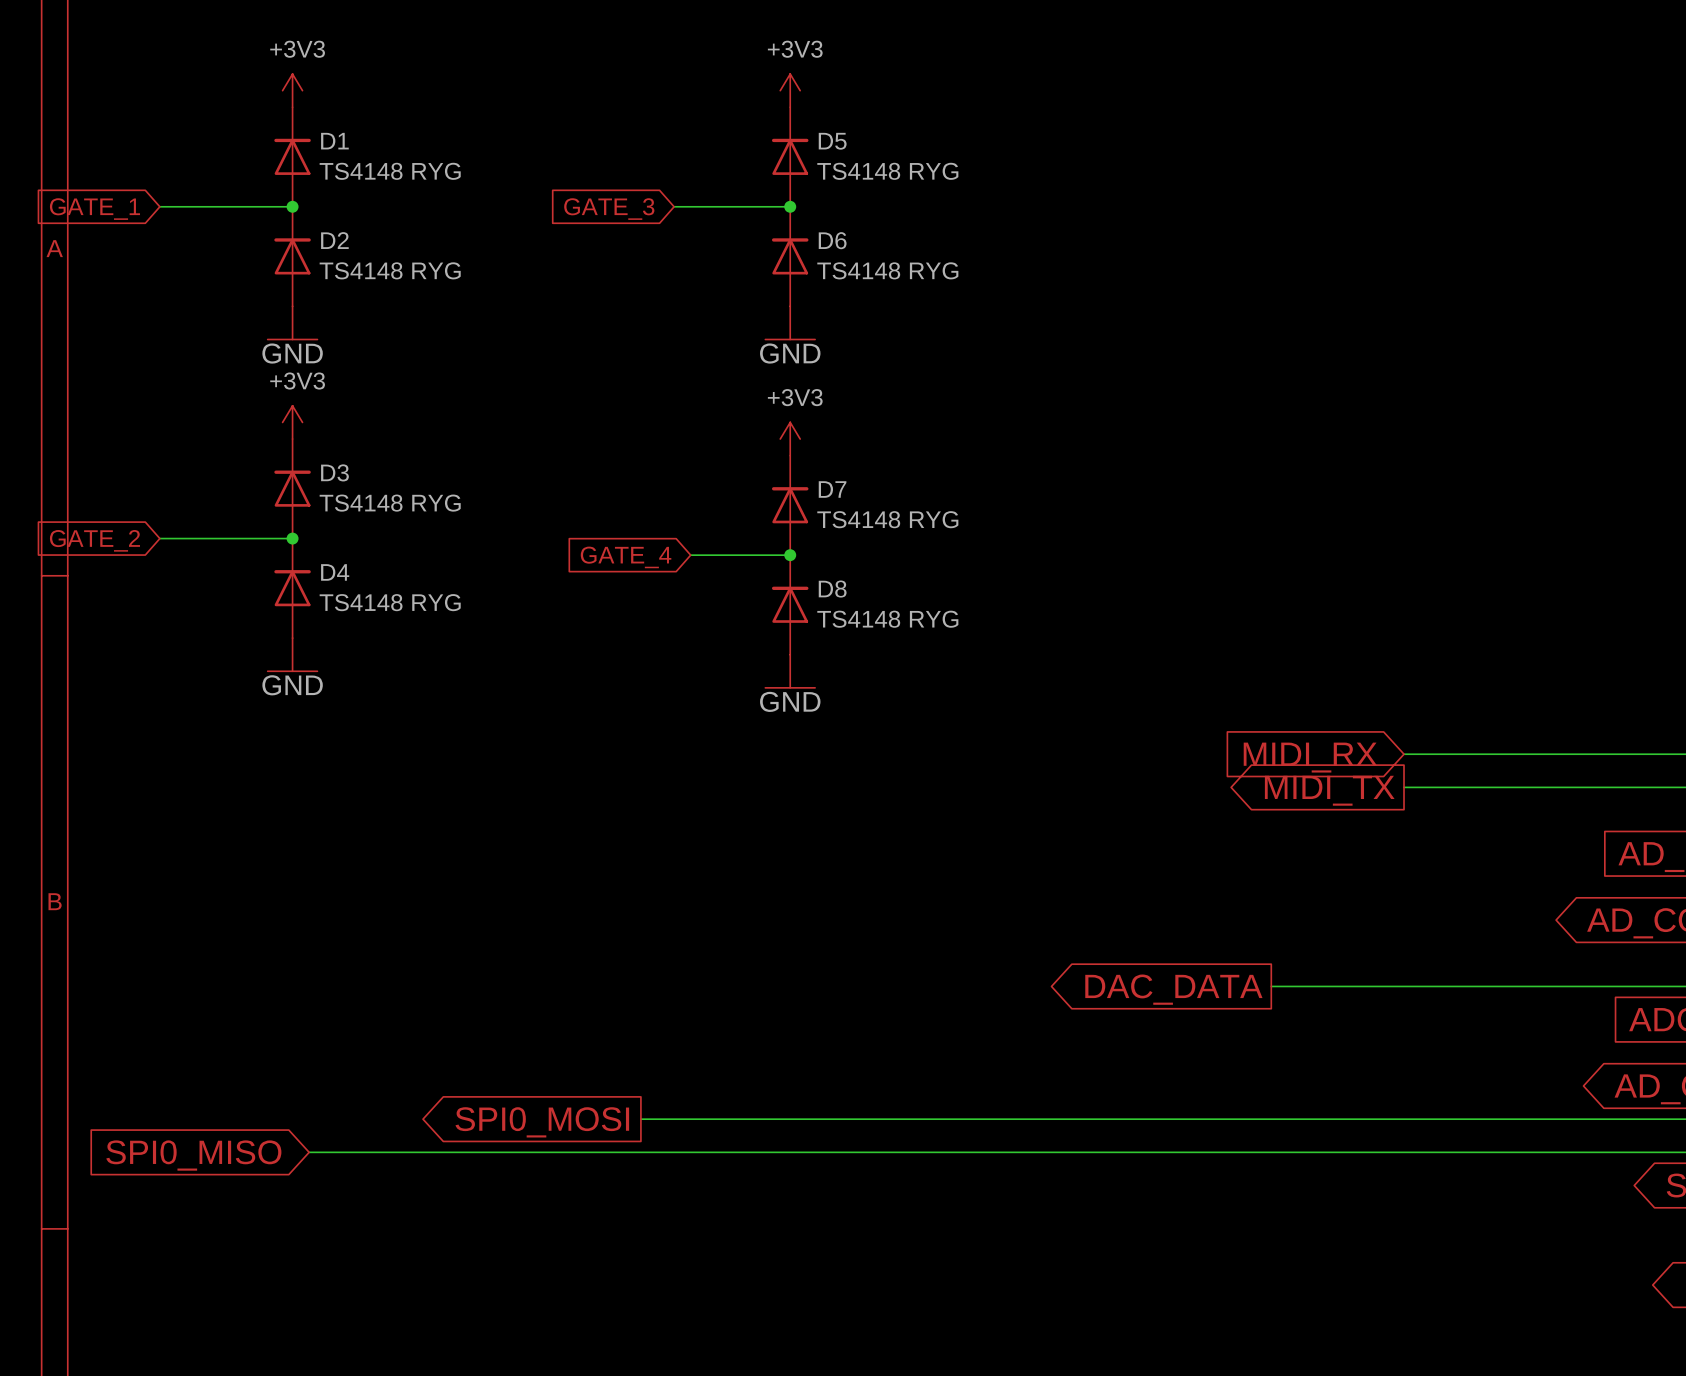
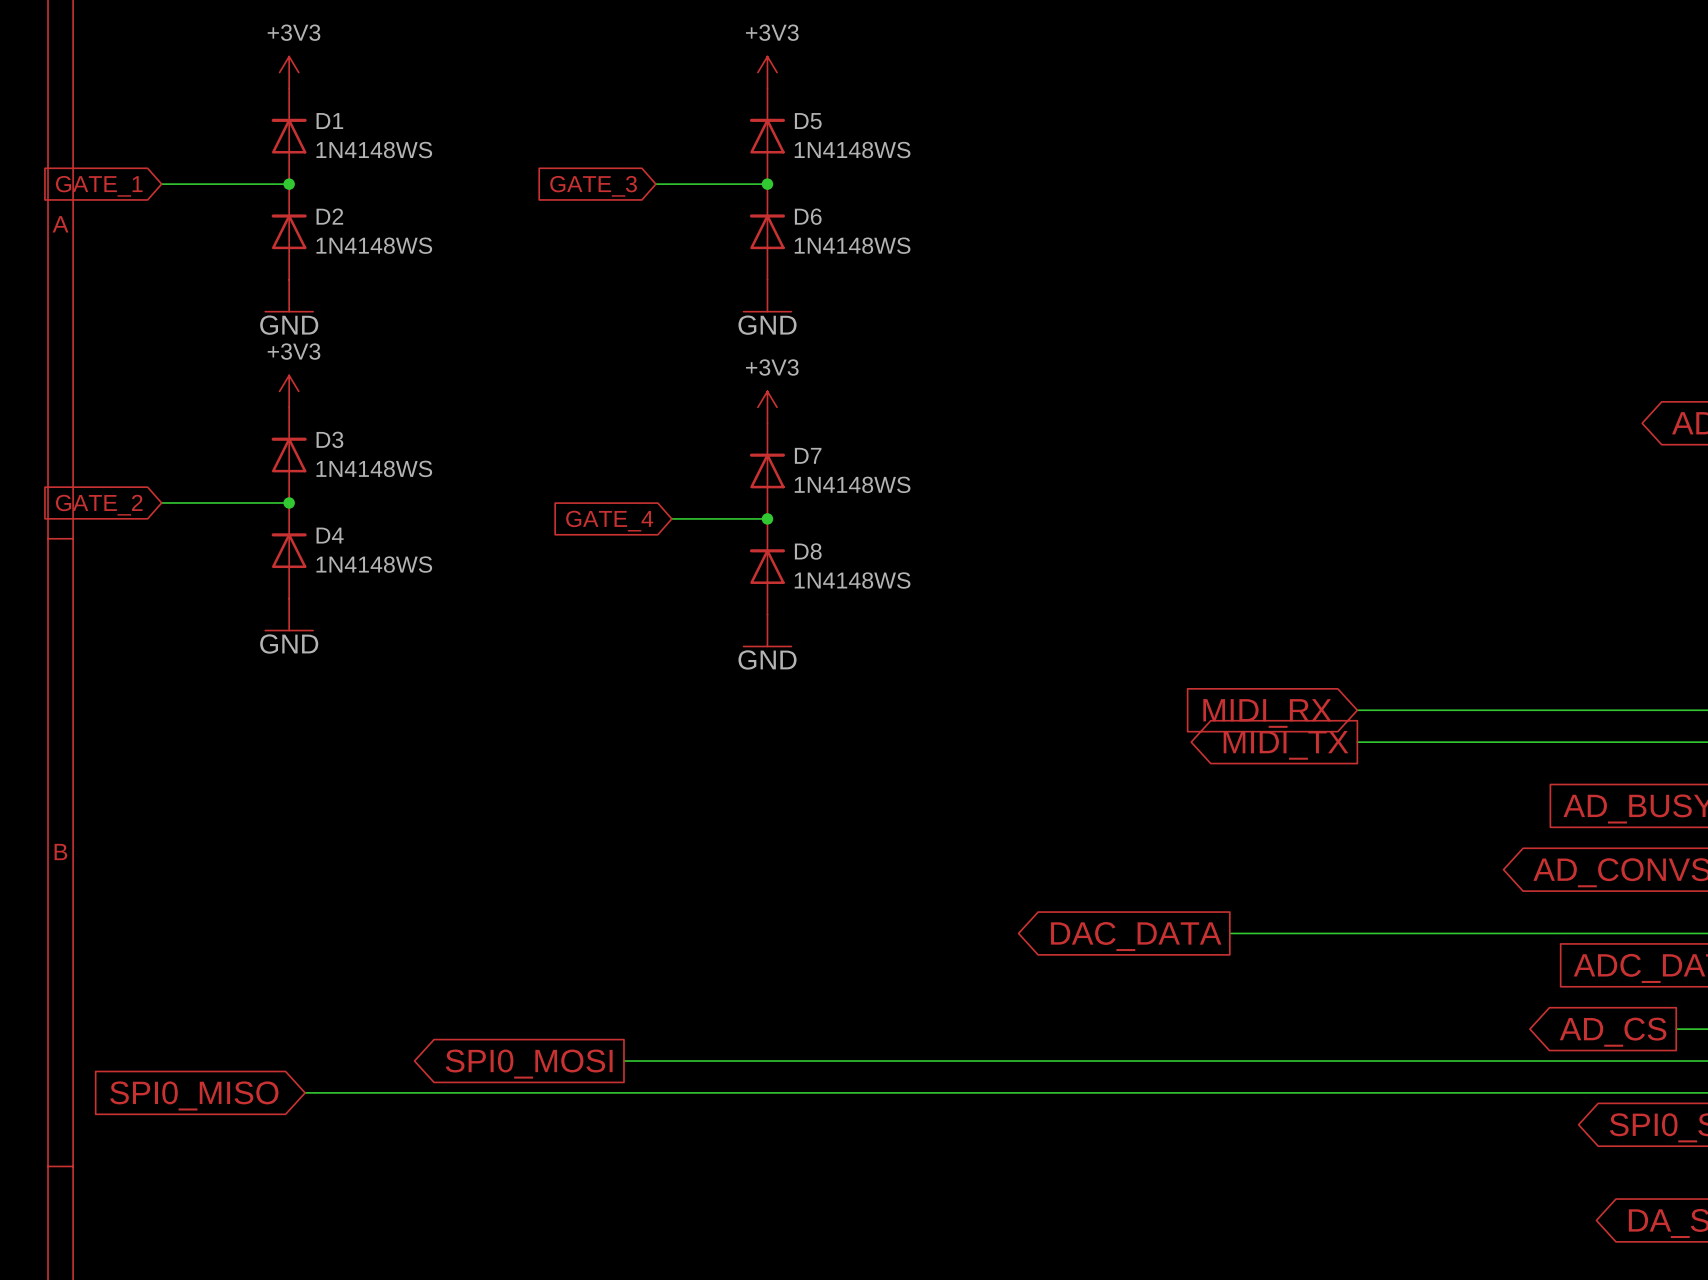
D1 value: TS4148 RYG (390, 171) -> 1N4148WS (374, 150)
D5 value: TS4148 RYG (887, 171) -> 1N4148WS (852, 150)
D2 value: TS4148 RYG (390, 270) -> 1N4148WS (374, 245)
D6 value: TS4148 RYG (887, 270) -> 1N4148WS (852, 245)
D3 value: TS4148 RYG (390, 503) -> 1N4148WS (374, 468)
D7 value: TS4148 RYG (887, 519) -> 1N4148WS (852, 484)
D4 value: TS4148 RYG (390, 602) -> 1N4148WS (374, 564)
D8 value: TS4148 RYG (887, 619) -> 1N4148WS (852, 580)

